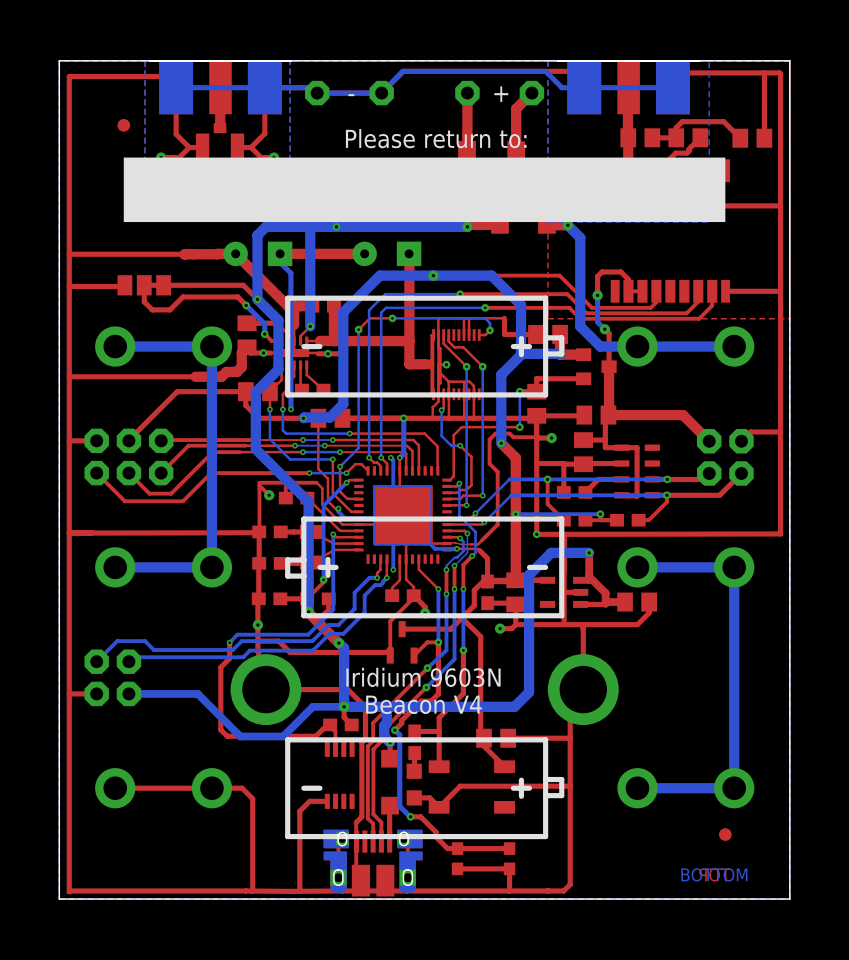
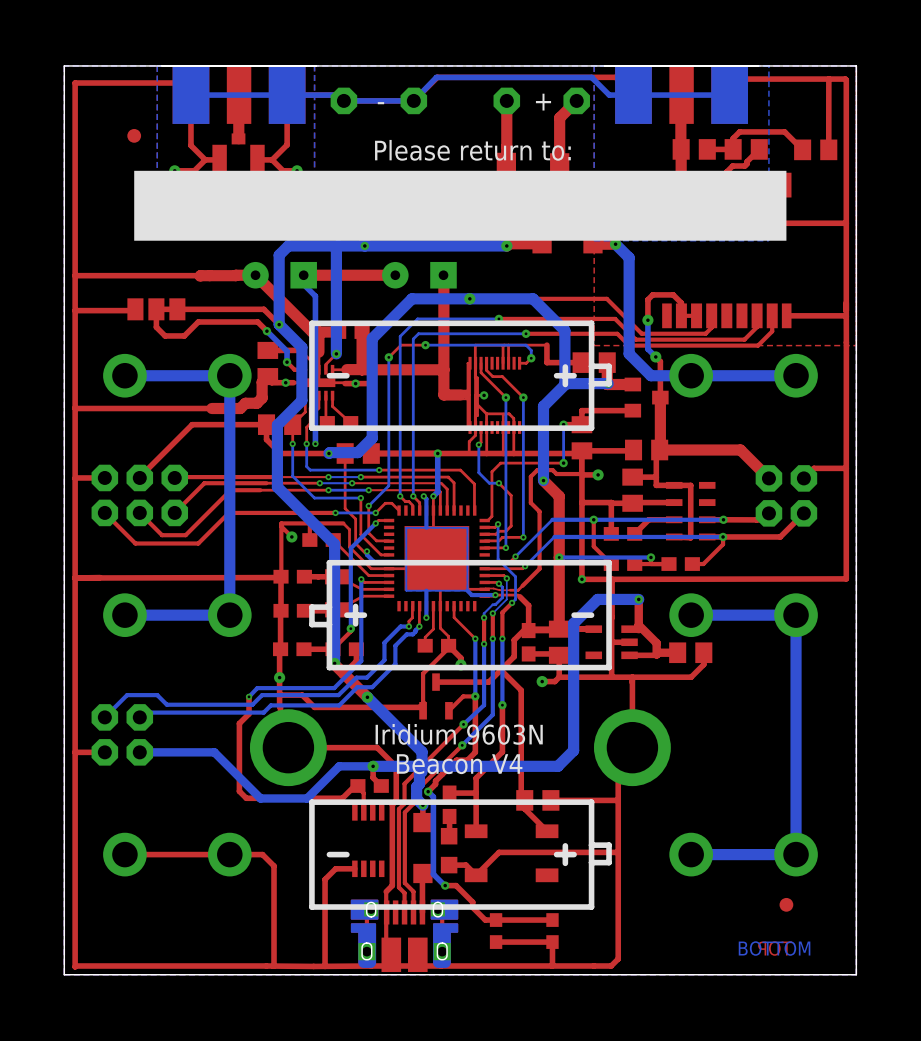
bottom track: (338, 643) (344, 648) (344, 706) -> (367, 697) (422, 751) (422, 772)

